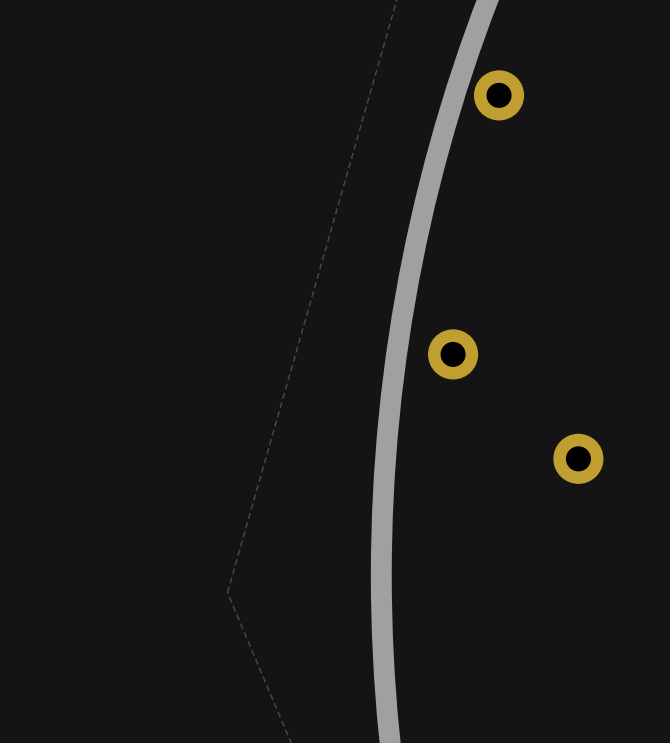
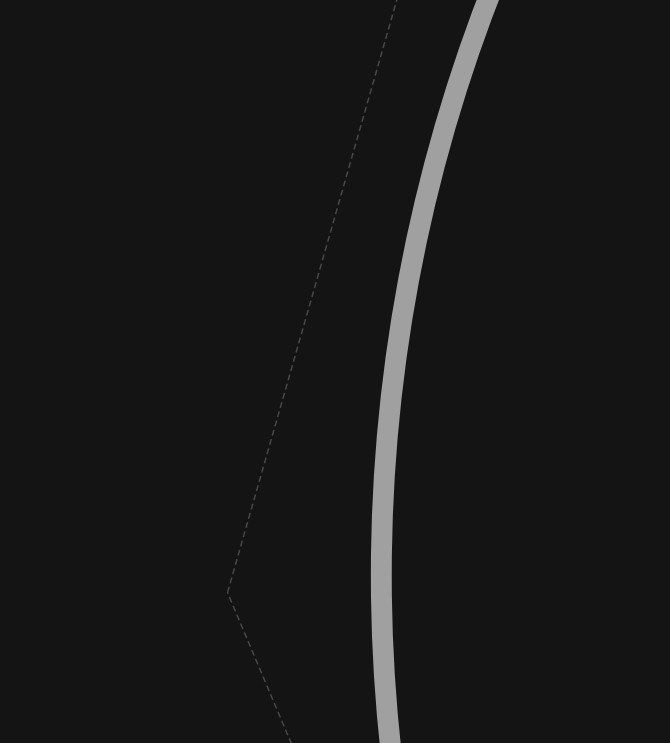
via: (499, 95) -> none
via: (453, 354) -> none
via: (578, 458) -> none

